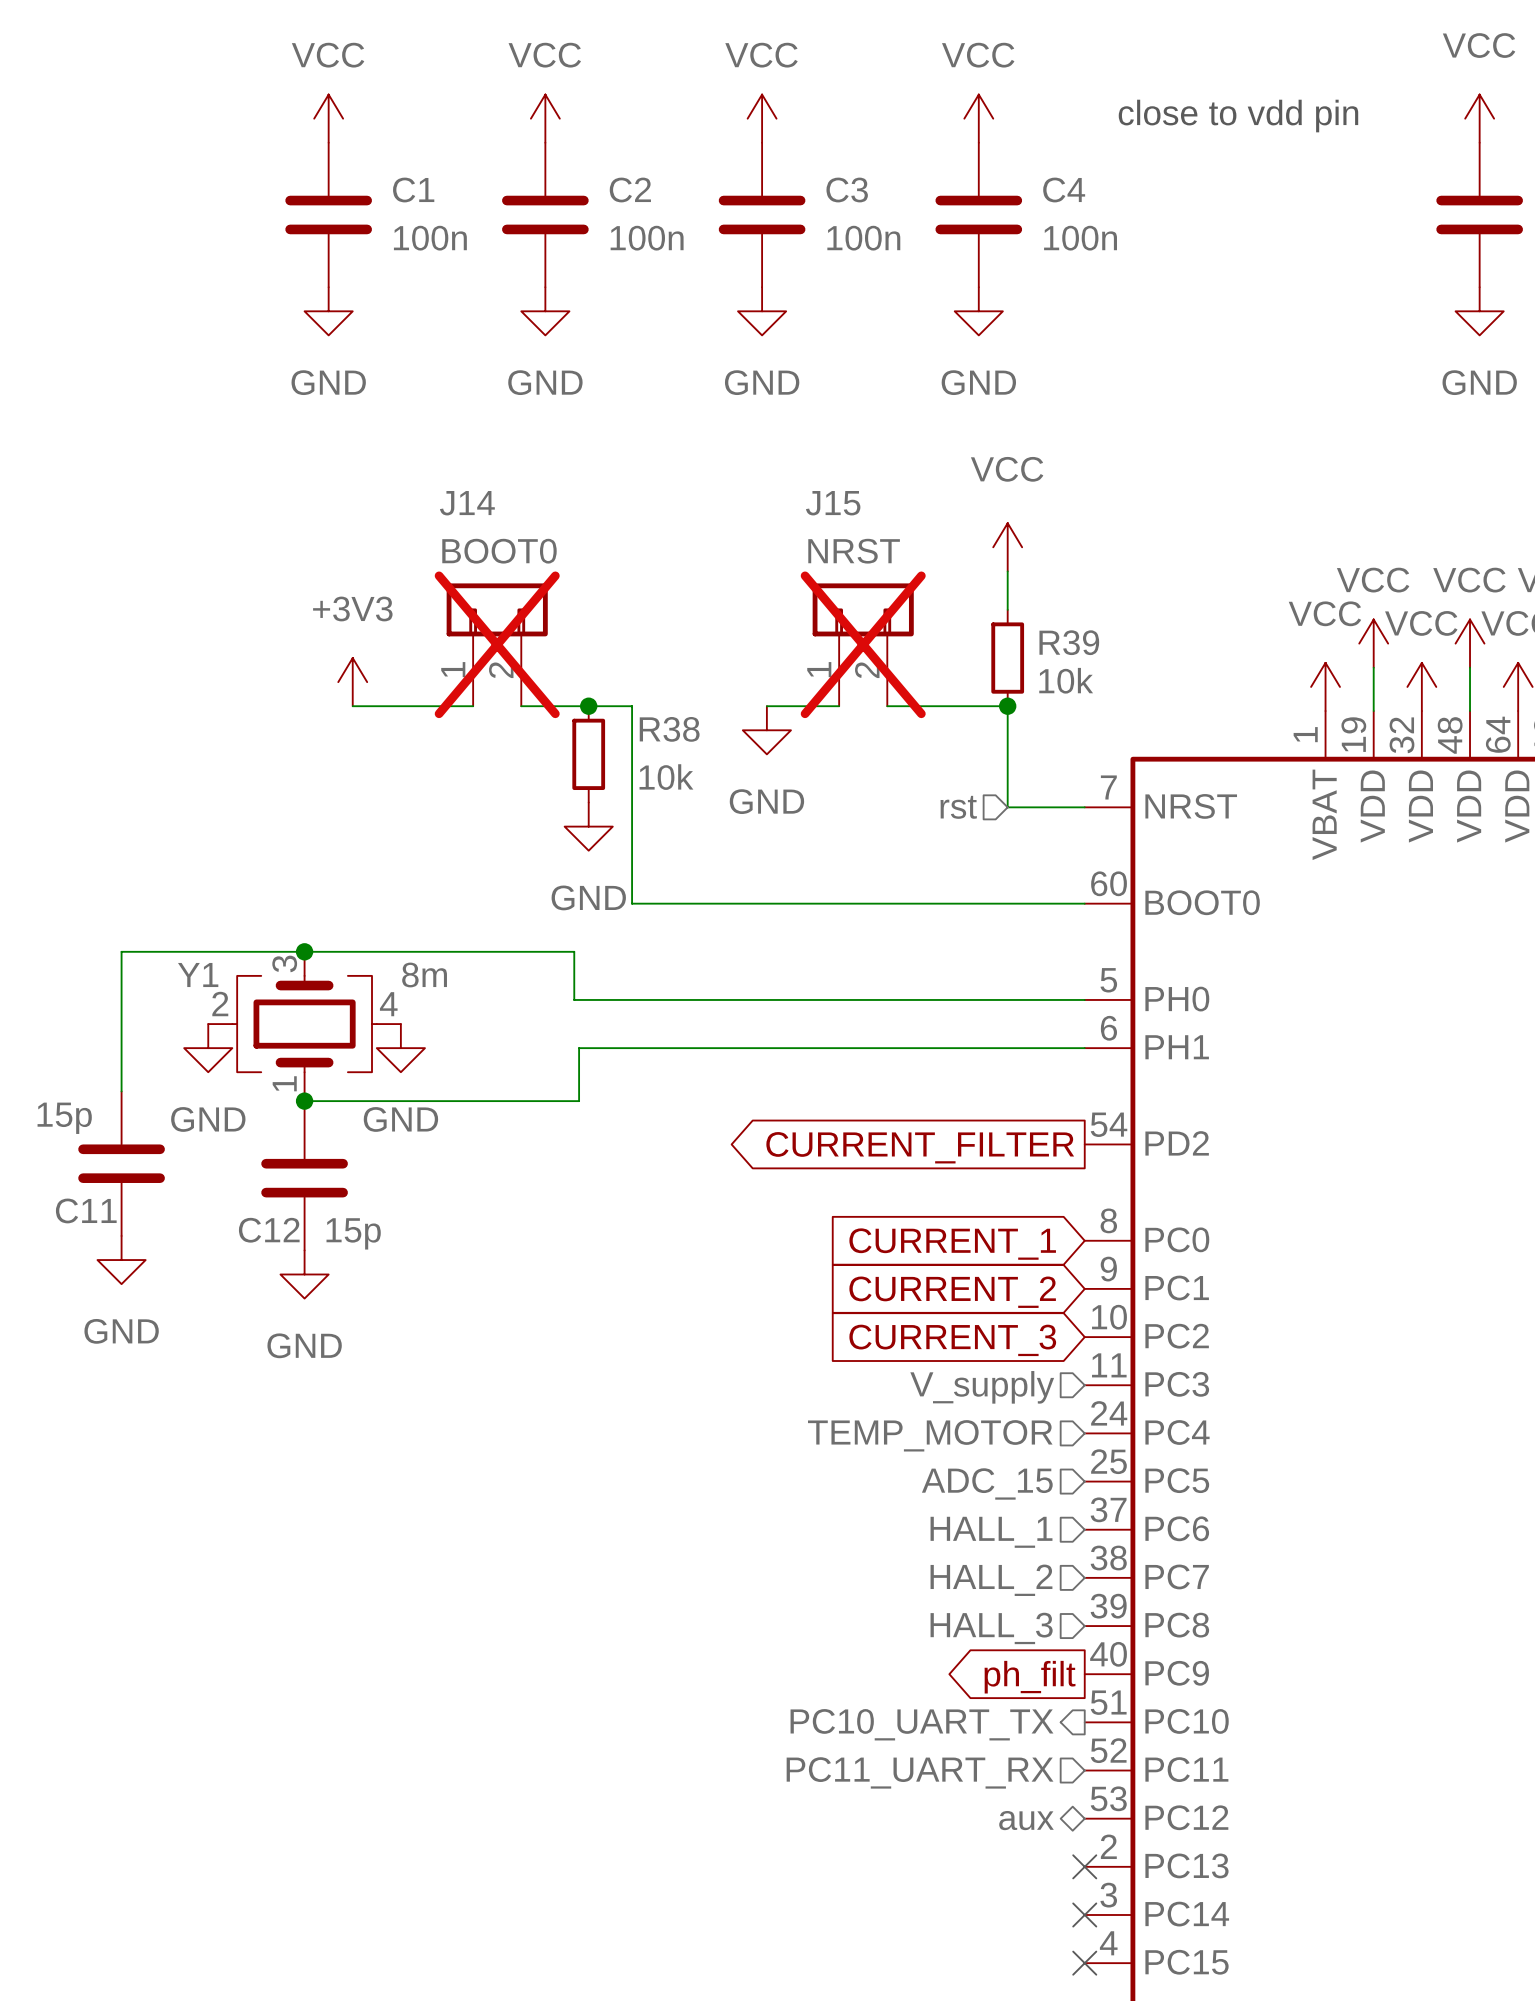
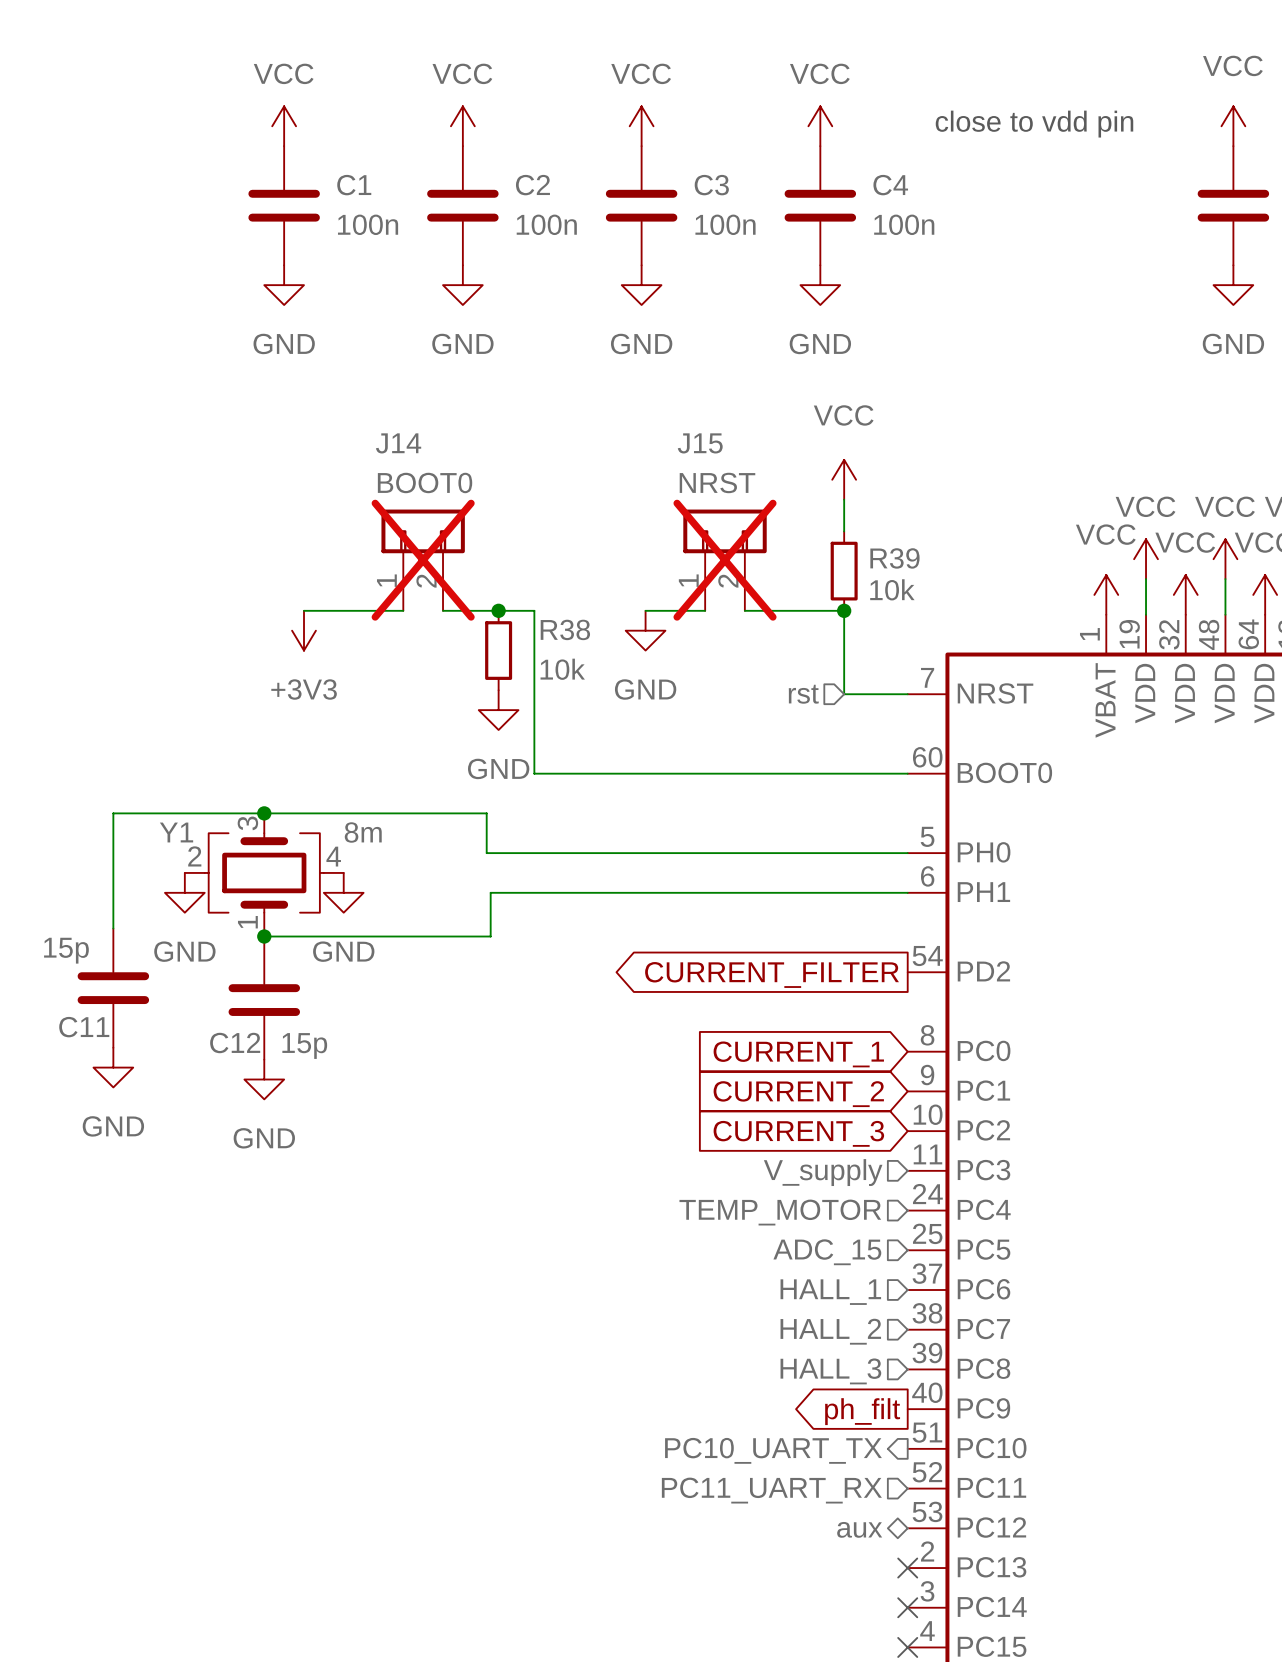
power symbol rotation: 0° (352, 682) -> 180° (304, 630)
power symbol position: +3V3 (352, 682) -> +3V3 (304, 630)

